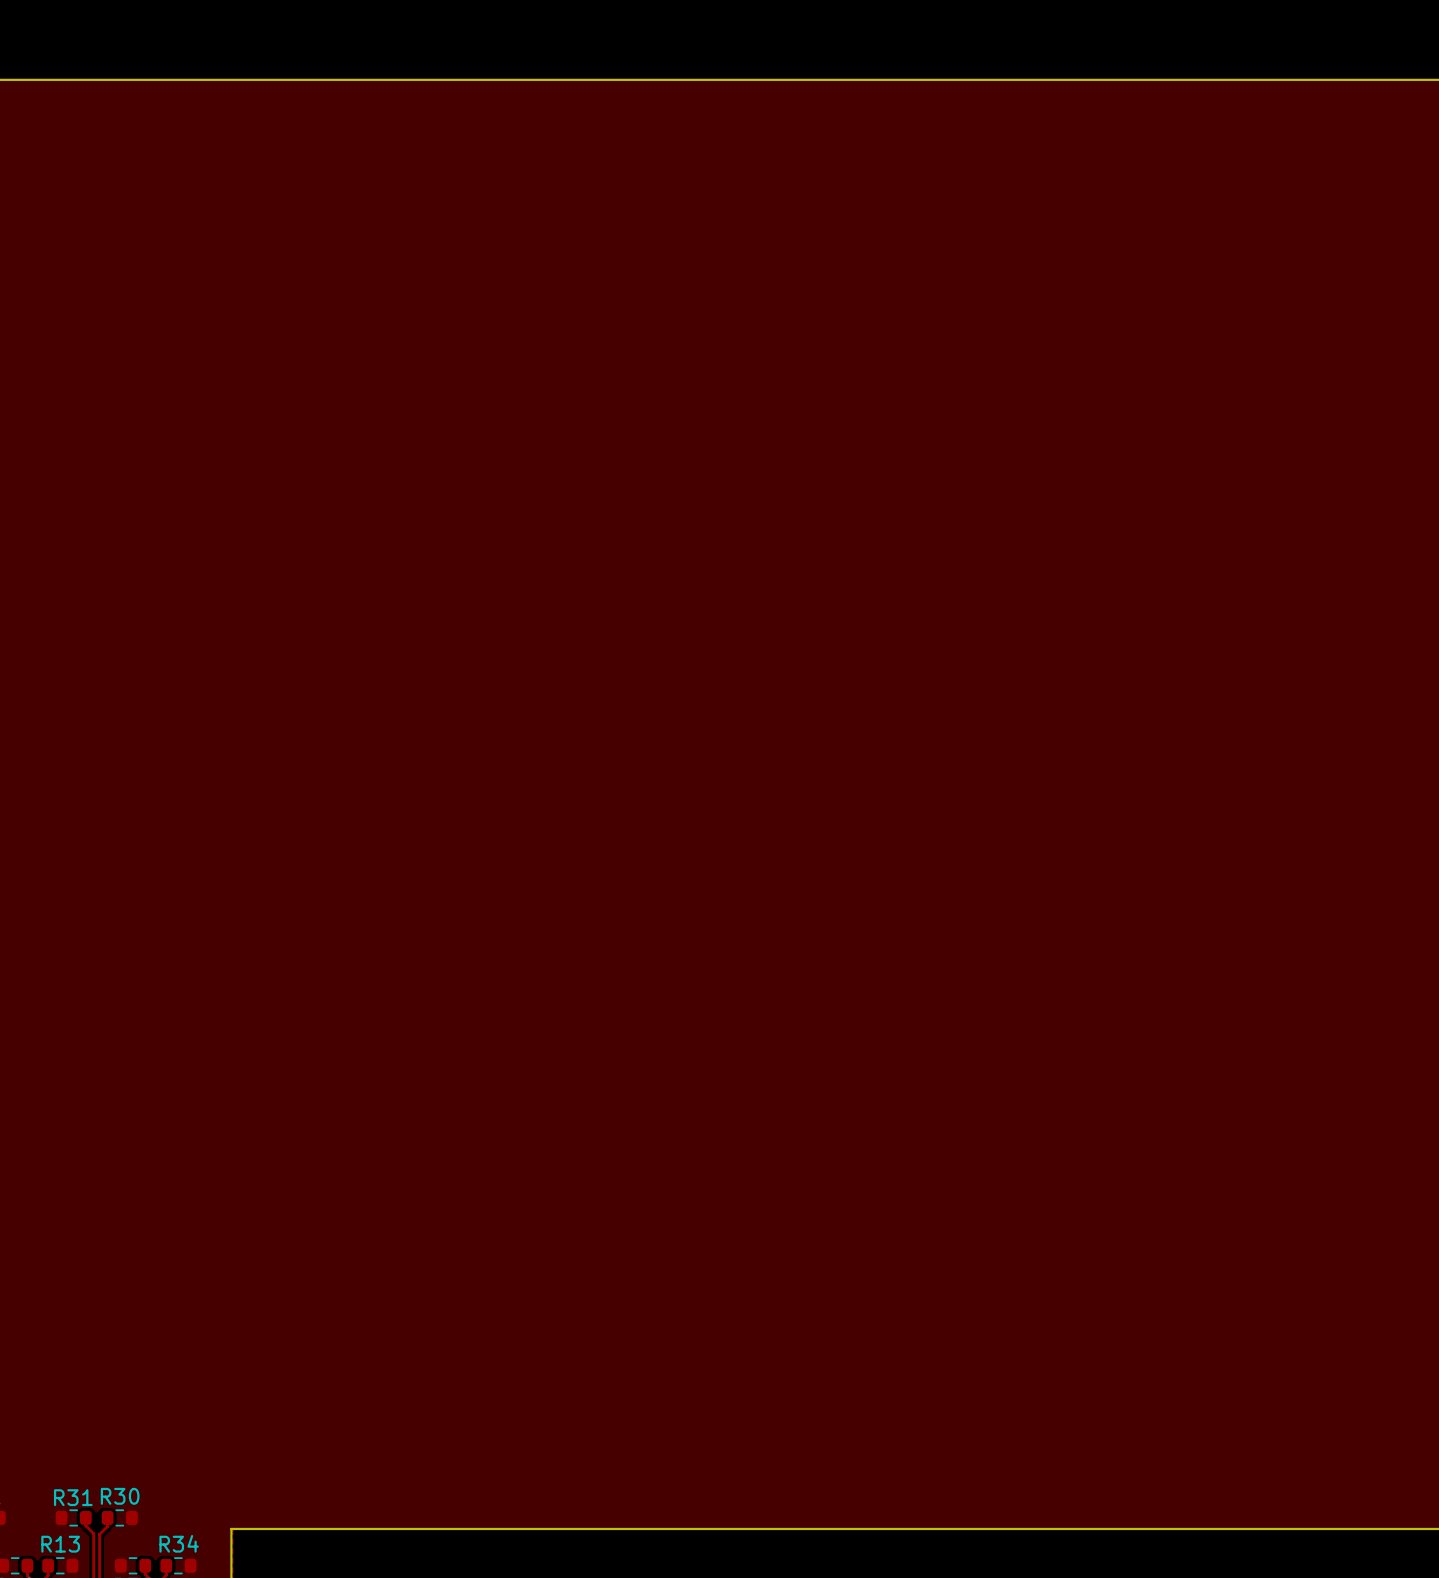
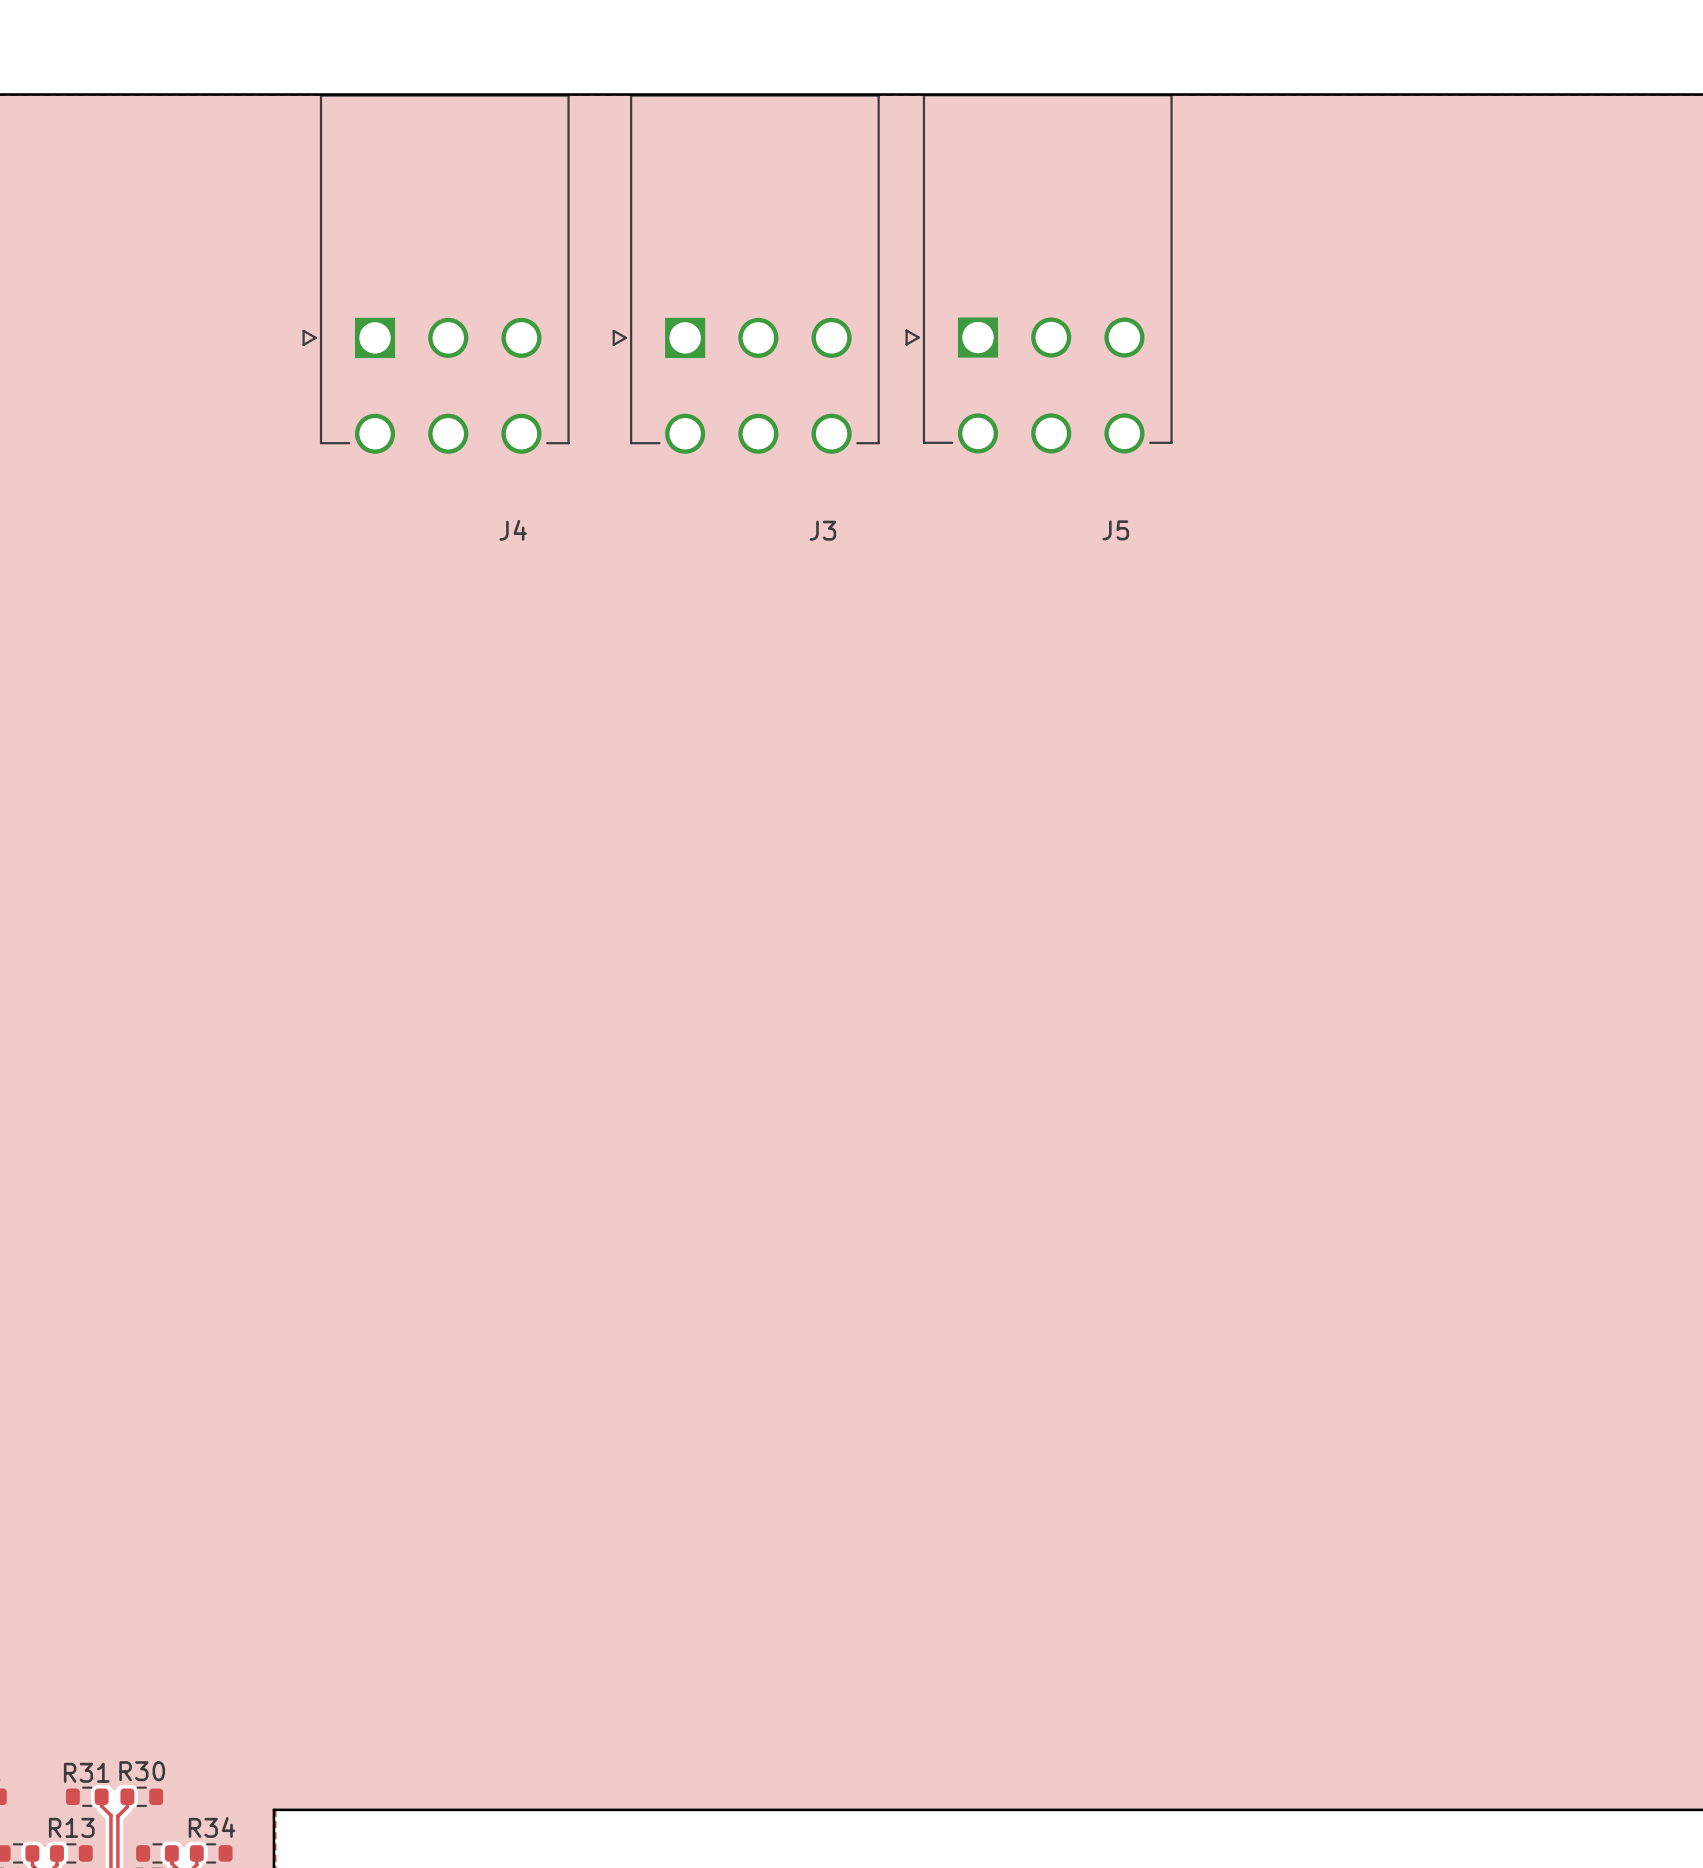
J4: none -> (436, 274)
J3: none -> (746, 274)
J5: none -> (1039, 273)

